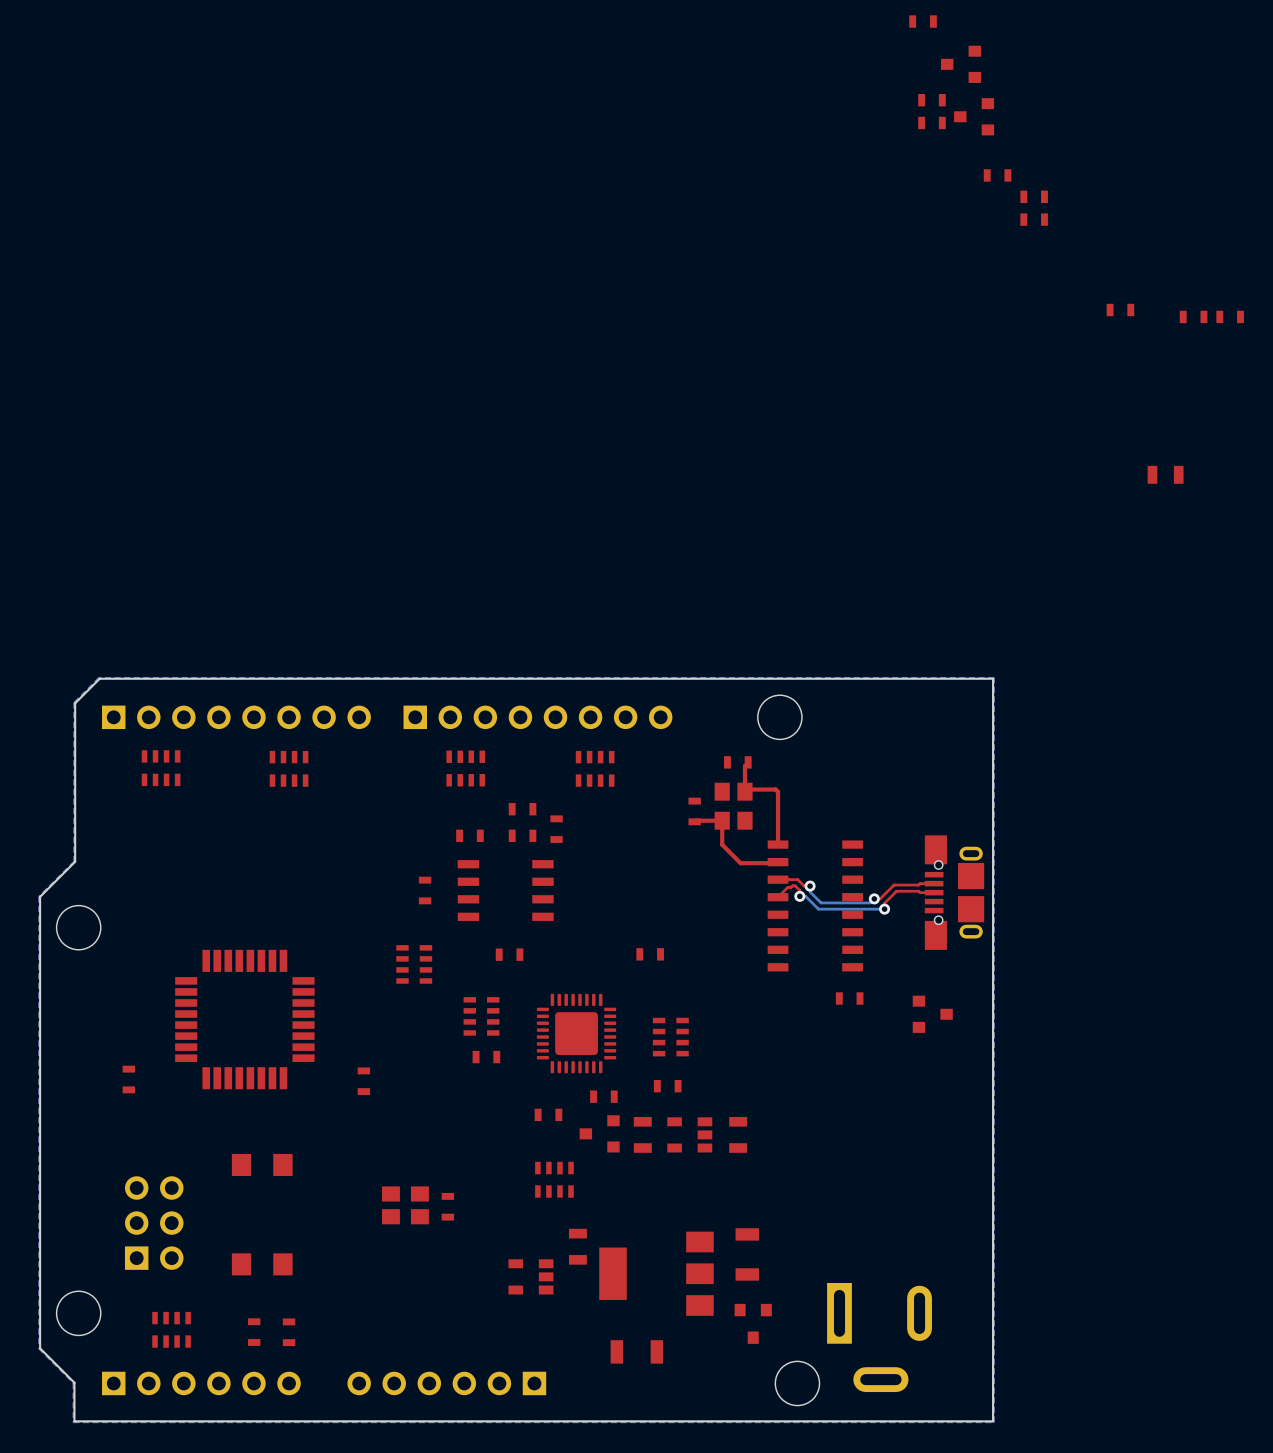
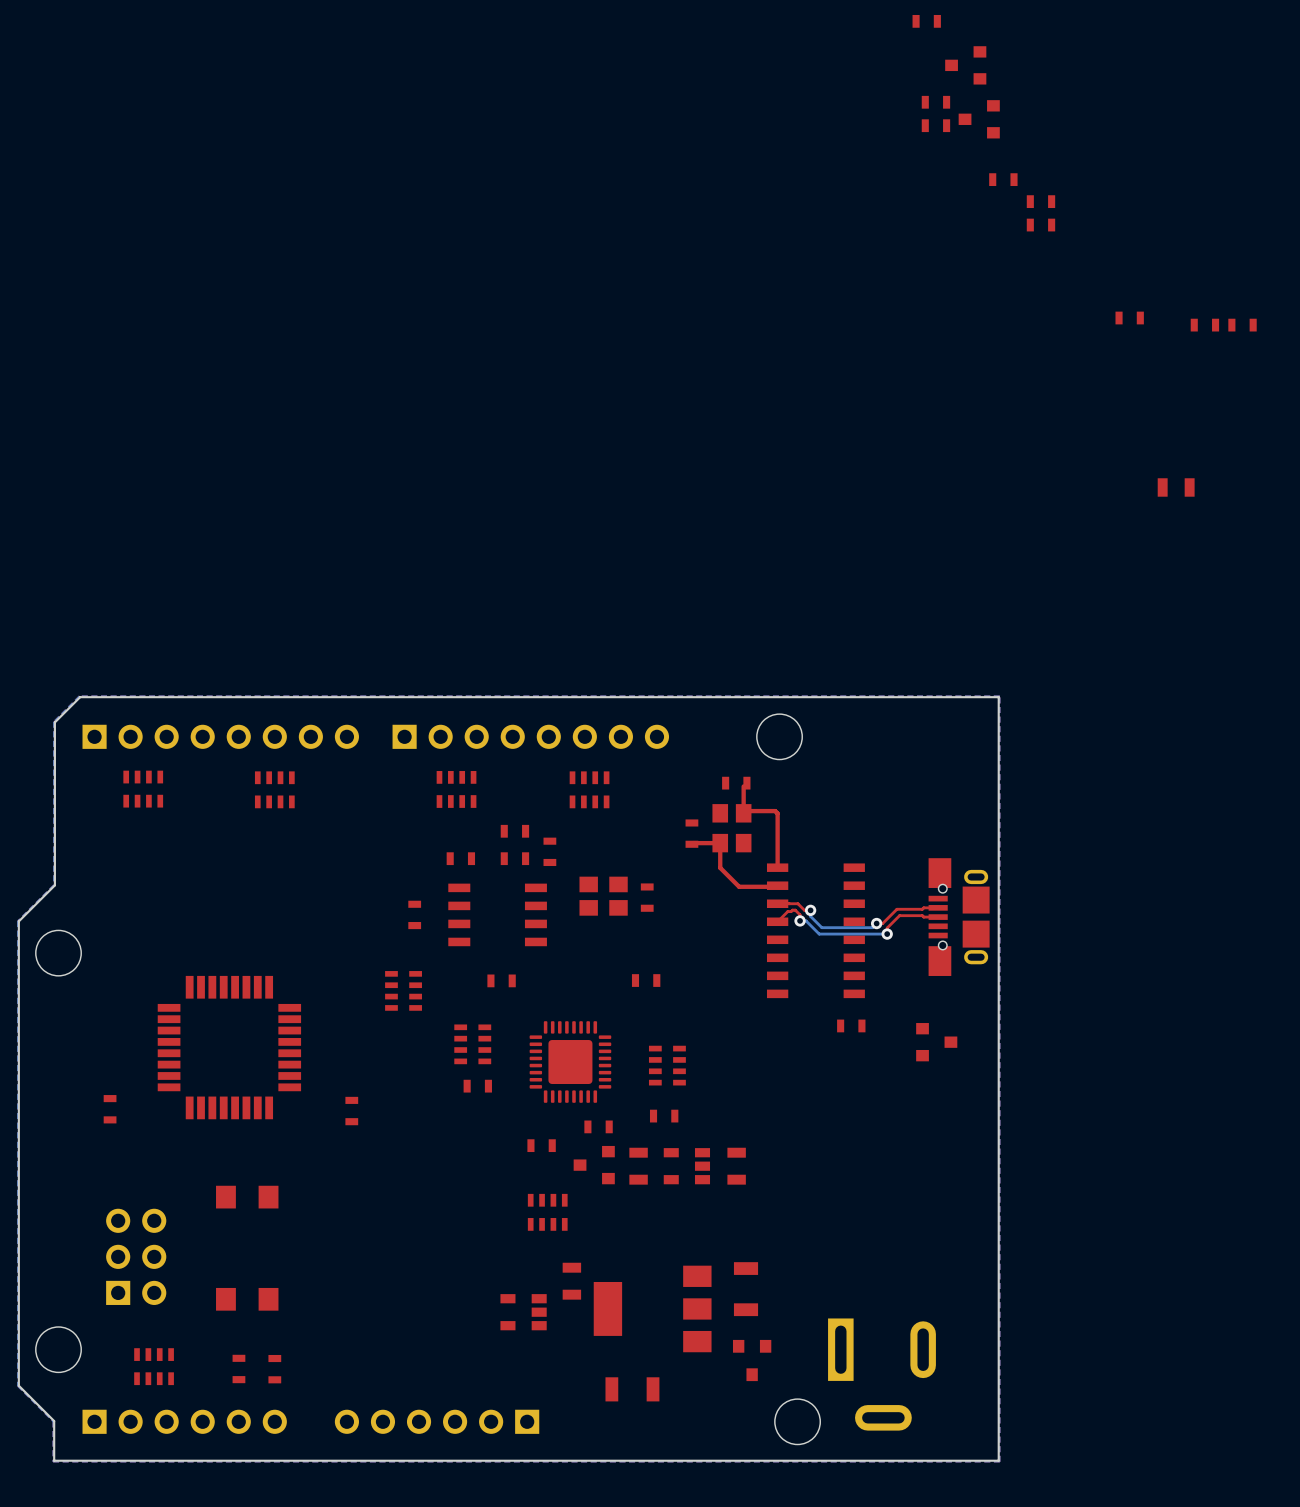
part: none -> (603, 896)
part: none -> (647, 897)
part: (405, 1205) -> none
part: (447, 1206) -> none

